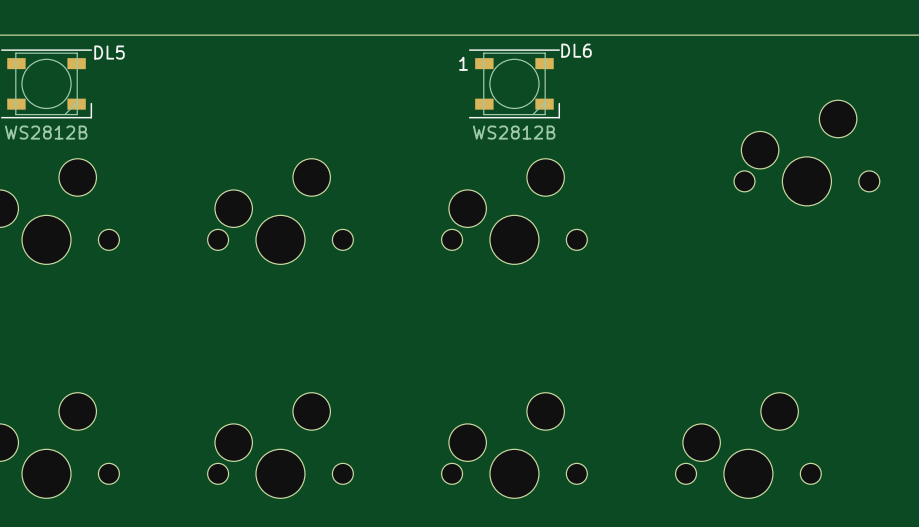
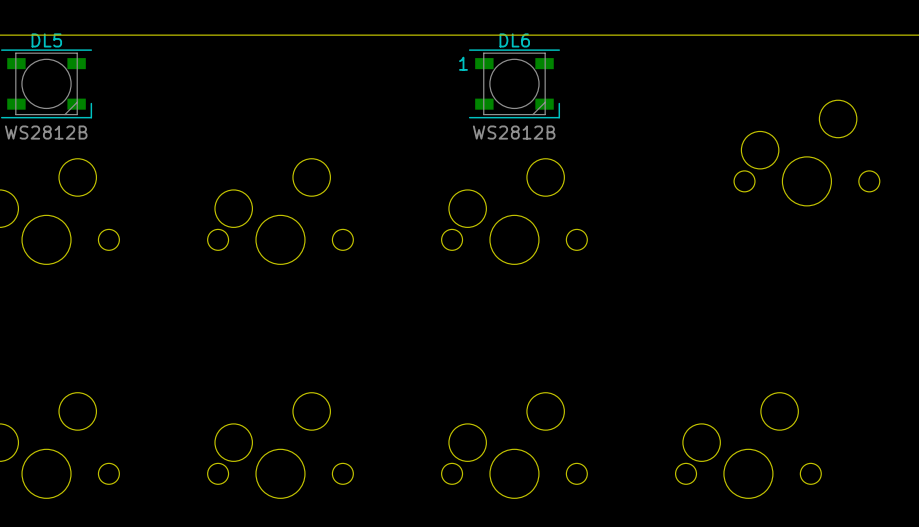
DL6 name position: DL6 (576, 50) -> DL6 (514, 40)
DL5 name position: DL5 (109, 52) -> DL5 (46, 40)

